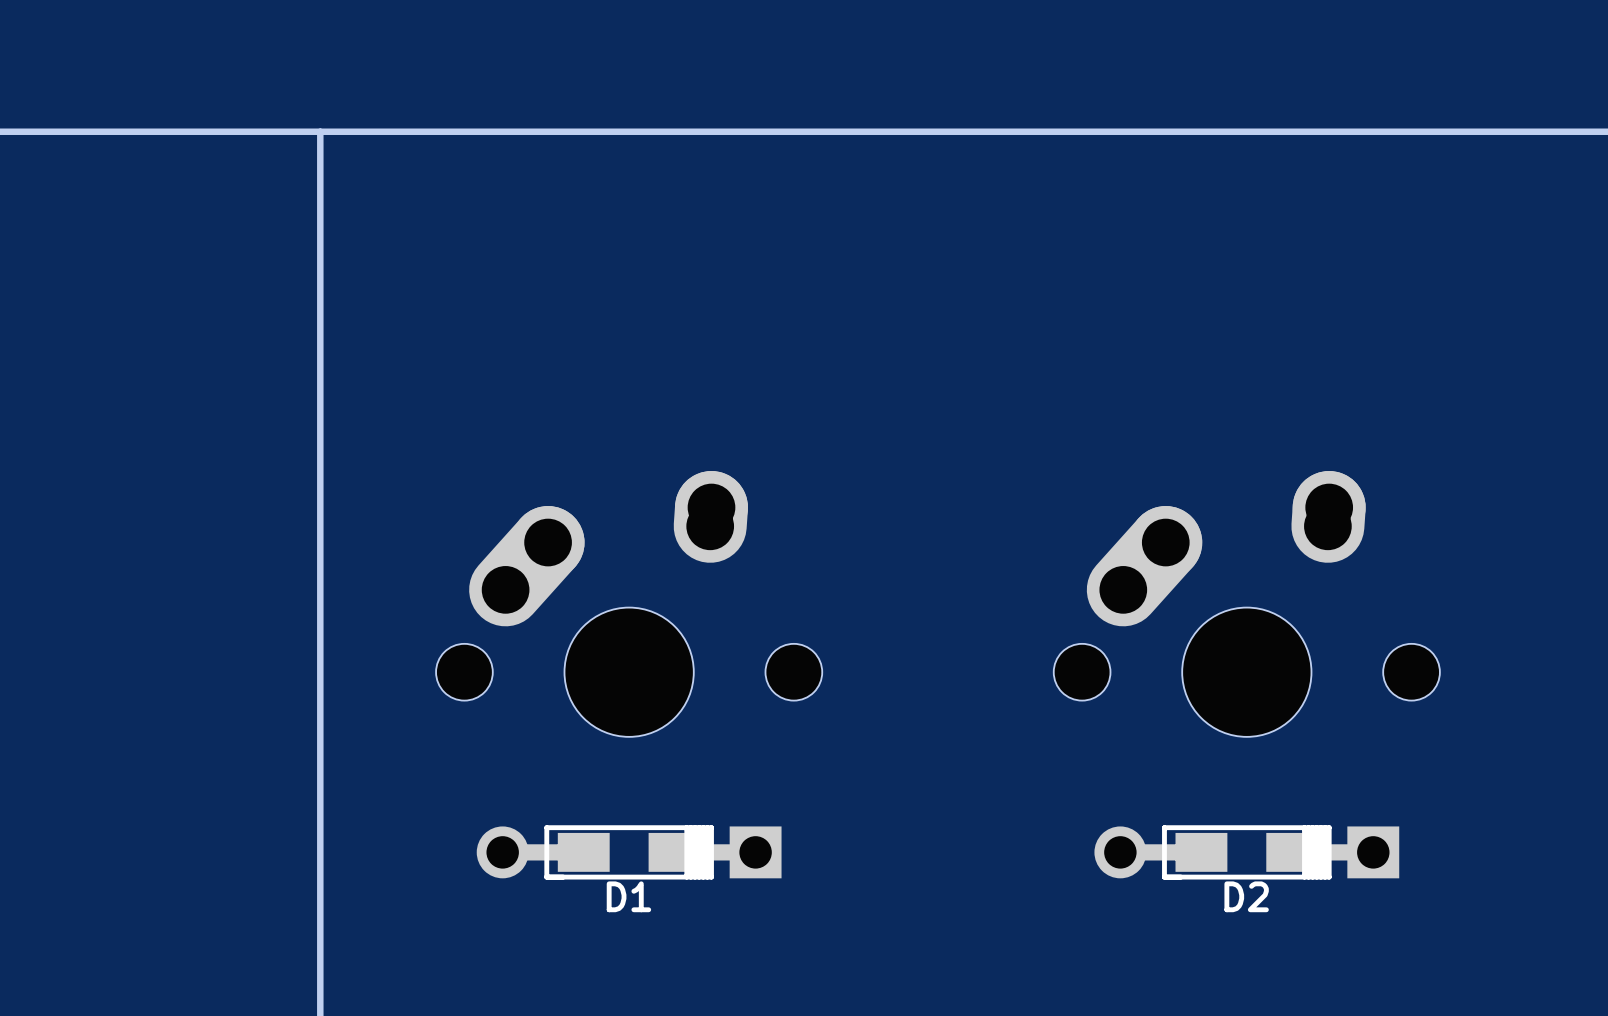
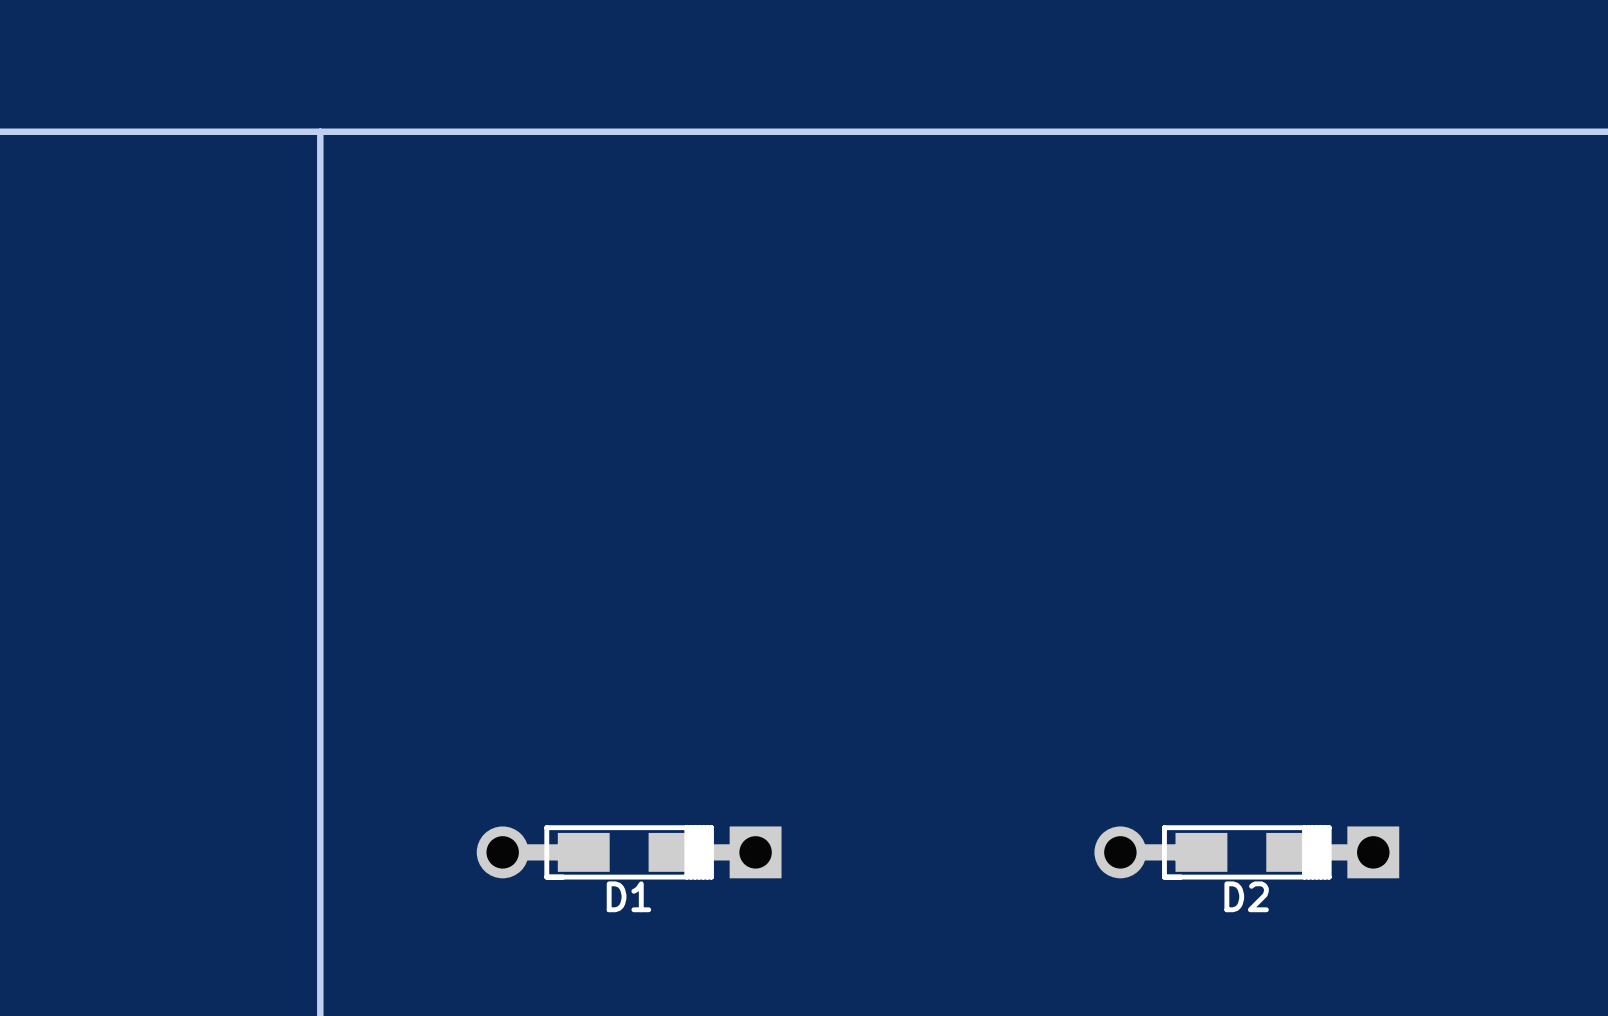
part: (629, 603) -> none
part: (1246, 603) -> none

